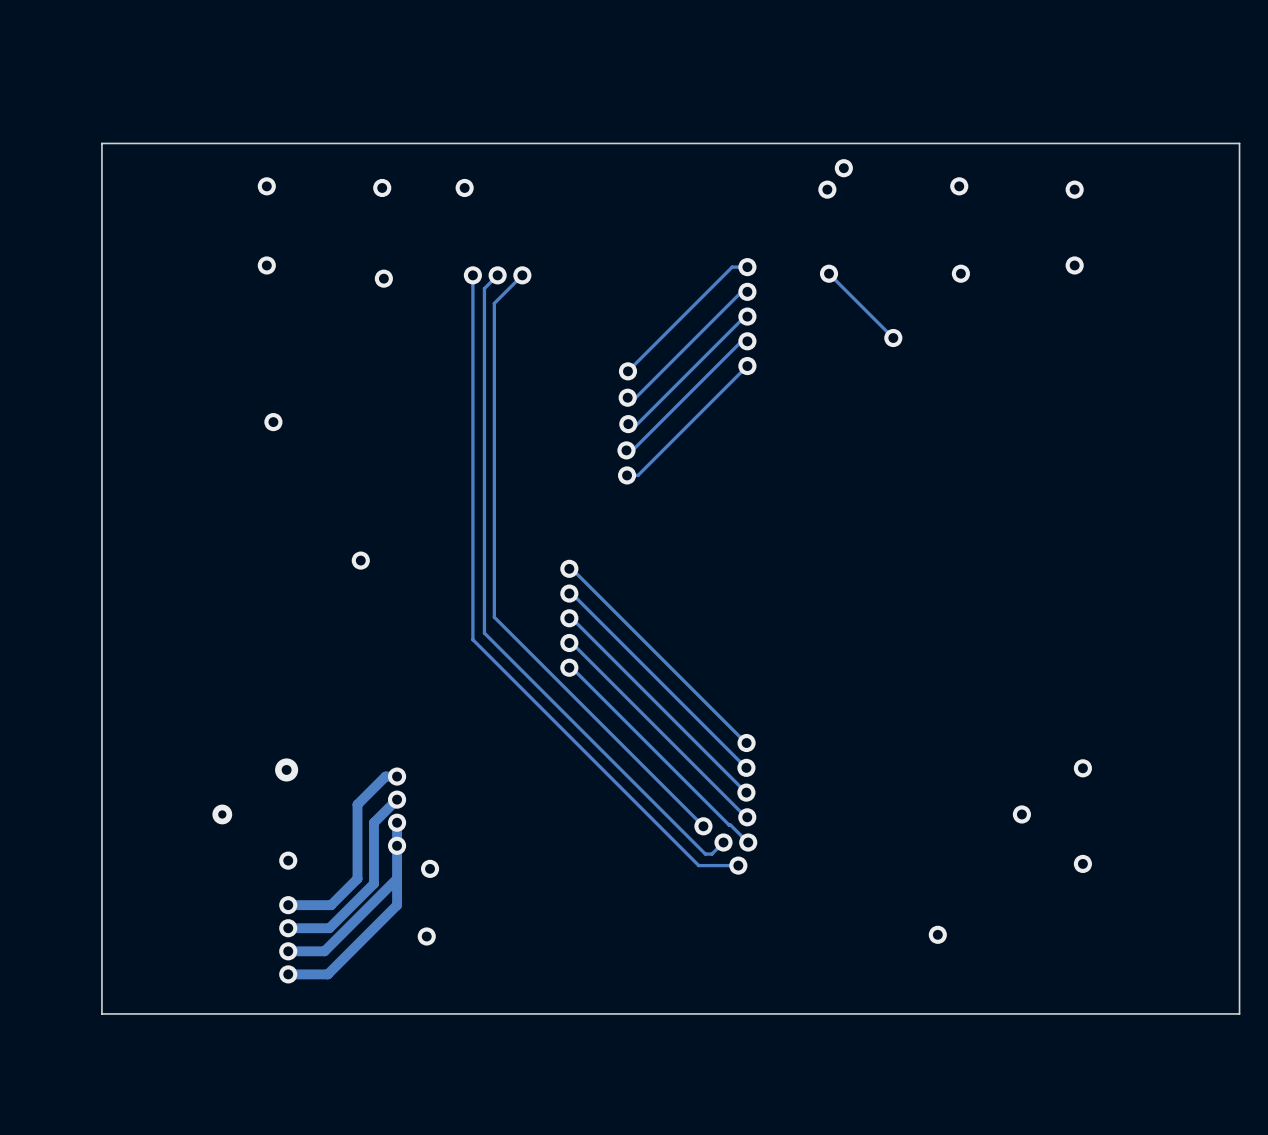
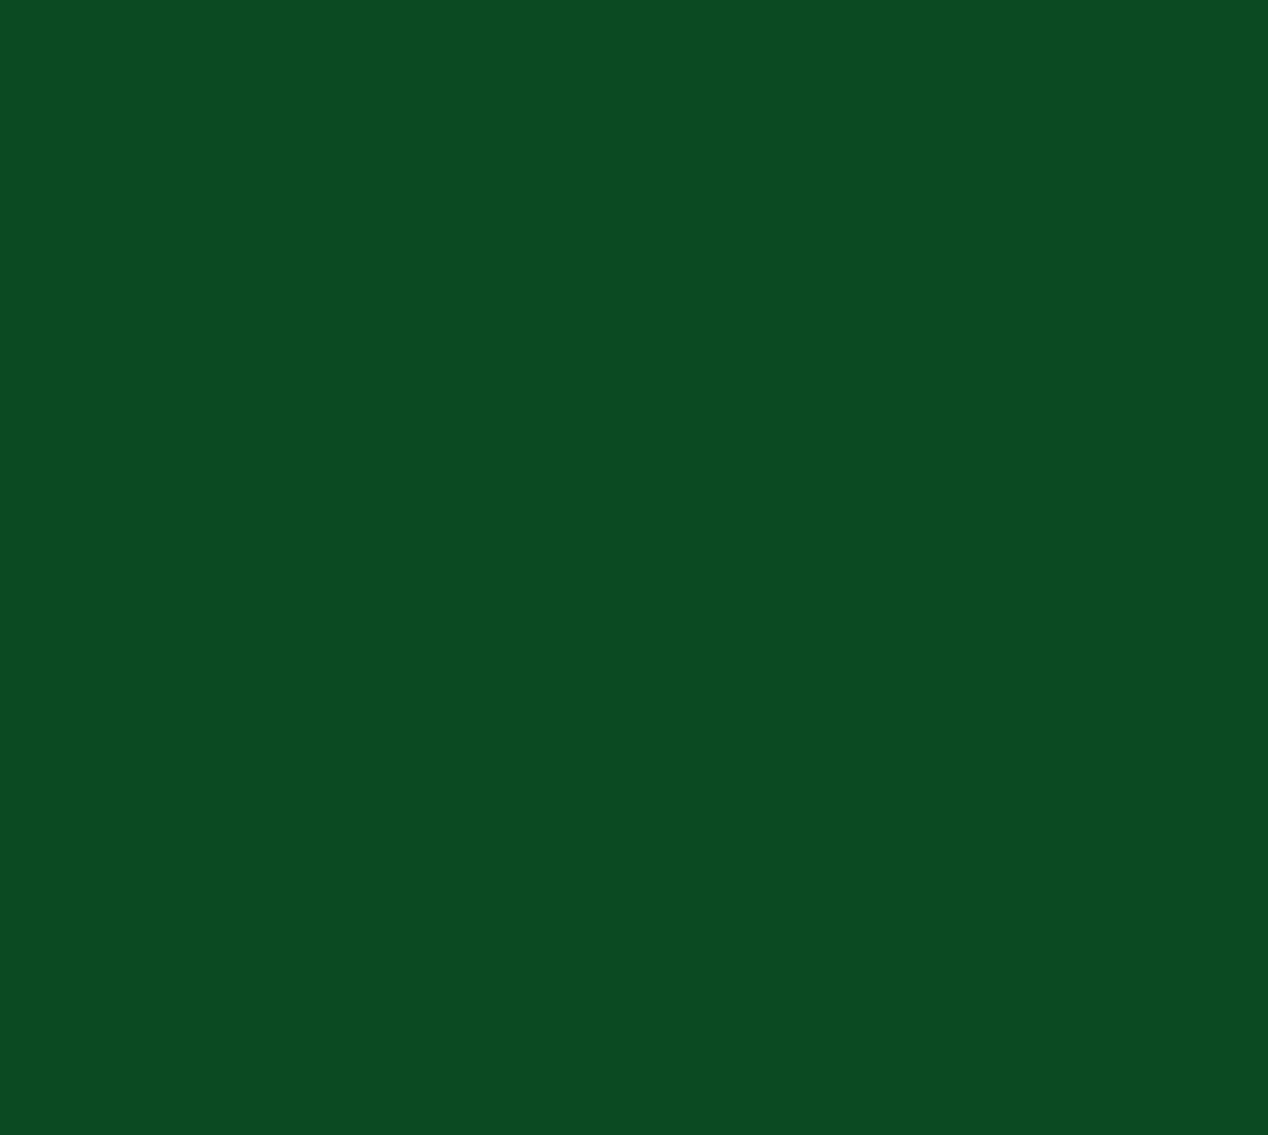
board edge: (1239, 143) (101, 143) (101, 1013) (1239, 1013) (1239, 143) -> none
via: (843, 168) -> none
via: (266, 186) -> none
via: (959, 186) -> none
via: (382, 187) -> none
via: (464, 187) -> none
via: (827, 189) -> none
via: (1074, 189) -> none
via: (266, 265) -> none
via: (1074, 265) -> none
track: (747, 267) (732, 267) (627, 371) -> none
via: (747, 267) -> none
track: (829, 273) (893, 338) -> none
via: (829, 273) -> none
via: (960, 273) -> none
track: (472, 275) (472, 639) (698, 865) (738, 865) -> none
via: (472, 275) -> none
track: (497, 275) (484, 288) (484, 633) (705, 854) (711, 854) (723, 842) -> none
via: (497, 275) -> none
track: (522, 275) (494, 303) (494, 617) (703, 826) -> none
via: (522, 275) -> none
via: (383, 278) -> none
track: (747, 291) (741, 291) (631, 402) -> none
via: (747, 291) -> none
track: (747, 316) (744, 316) (634, 427) (631, 427) -> none
via: (747, 316) -> none
via: (893, 338) -> none
track: (747, 341) (741, 341) (631, 451) -> none
via: (747, 341) -> none
track: (744, 366) (747, 366) (638, 475) (627, 475) -> none
via: (747, 366) -> none
via: (627, 371) -> none
via: (627, 397) -> none
via: (273, 422) -> none
via: (628, 424) -> none
via: (626, 450) -> none
via: (627, 475) -> none
via: (360, 560) -> none
track: (569, 568) (571, 568) (746, 743) -> none
via: (569, 568) -> none
track: (569, 593) (571, 593) (746, 767) -> none
via: (569, 593) -> none
track: (569, 618) (571, 618) (746, 792) -> none
via: (569, 618) -> none
track: (569, 643) (571, 643) (747, 817) -> none
via: (569, 643) -> none
track: (569, 667) (571, 667) (747, 842) -> none
via: (569, 667) -> none
via: (746, 743) -> none
via: (746, 767) -> none
via: (1082, 768) -> none
via: (286, 769) -> none
track: (397, 776) (385, 776) (357, 804) (357, 878) (331, 905) (288, 905) -> none
via: (397, 776) -> none
via: (746, 792) -> none
track: (397, 799) (373, 822) (373, 883) (329, 928) (288, 928) -> none
via: (397, 799) -> none
via: (222, 814) -> none
via: (1021, 814) -> none
via: (747, 817) -> none
track: (397, 822) (397, 905) (327, 974) (288, 974) -> none
via: (397, 822) -> none
via: (703, 826) -> none
via: (723, 842) -> none
via: (748, 842) -> none
via: (397, 845) -> none
via: (288, 860) -> none
via: (1082, 863) -> none
via: (738, 865) -> none
via: (430, 868) -> none
track: (397, 878) (324, 951) (288, 951) -> none
via: (288, 905) -> none
via: (288, 928) -> none
via: (937, 934) -> none
via: (426, 936) -> none
via: (288, 951) -> none
via: (288, 974) -> none

